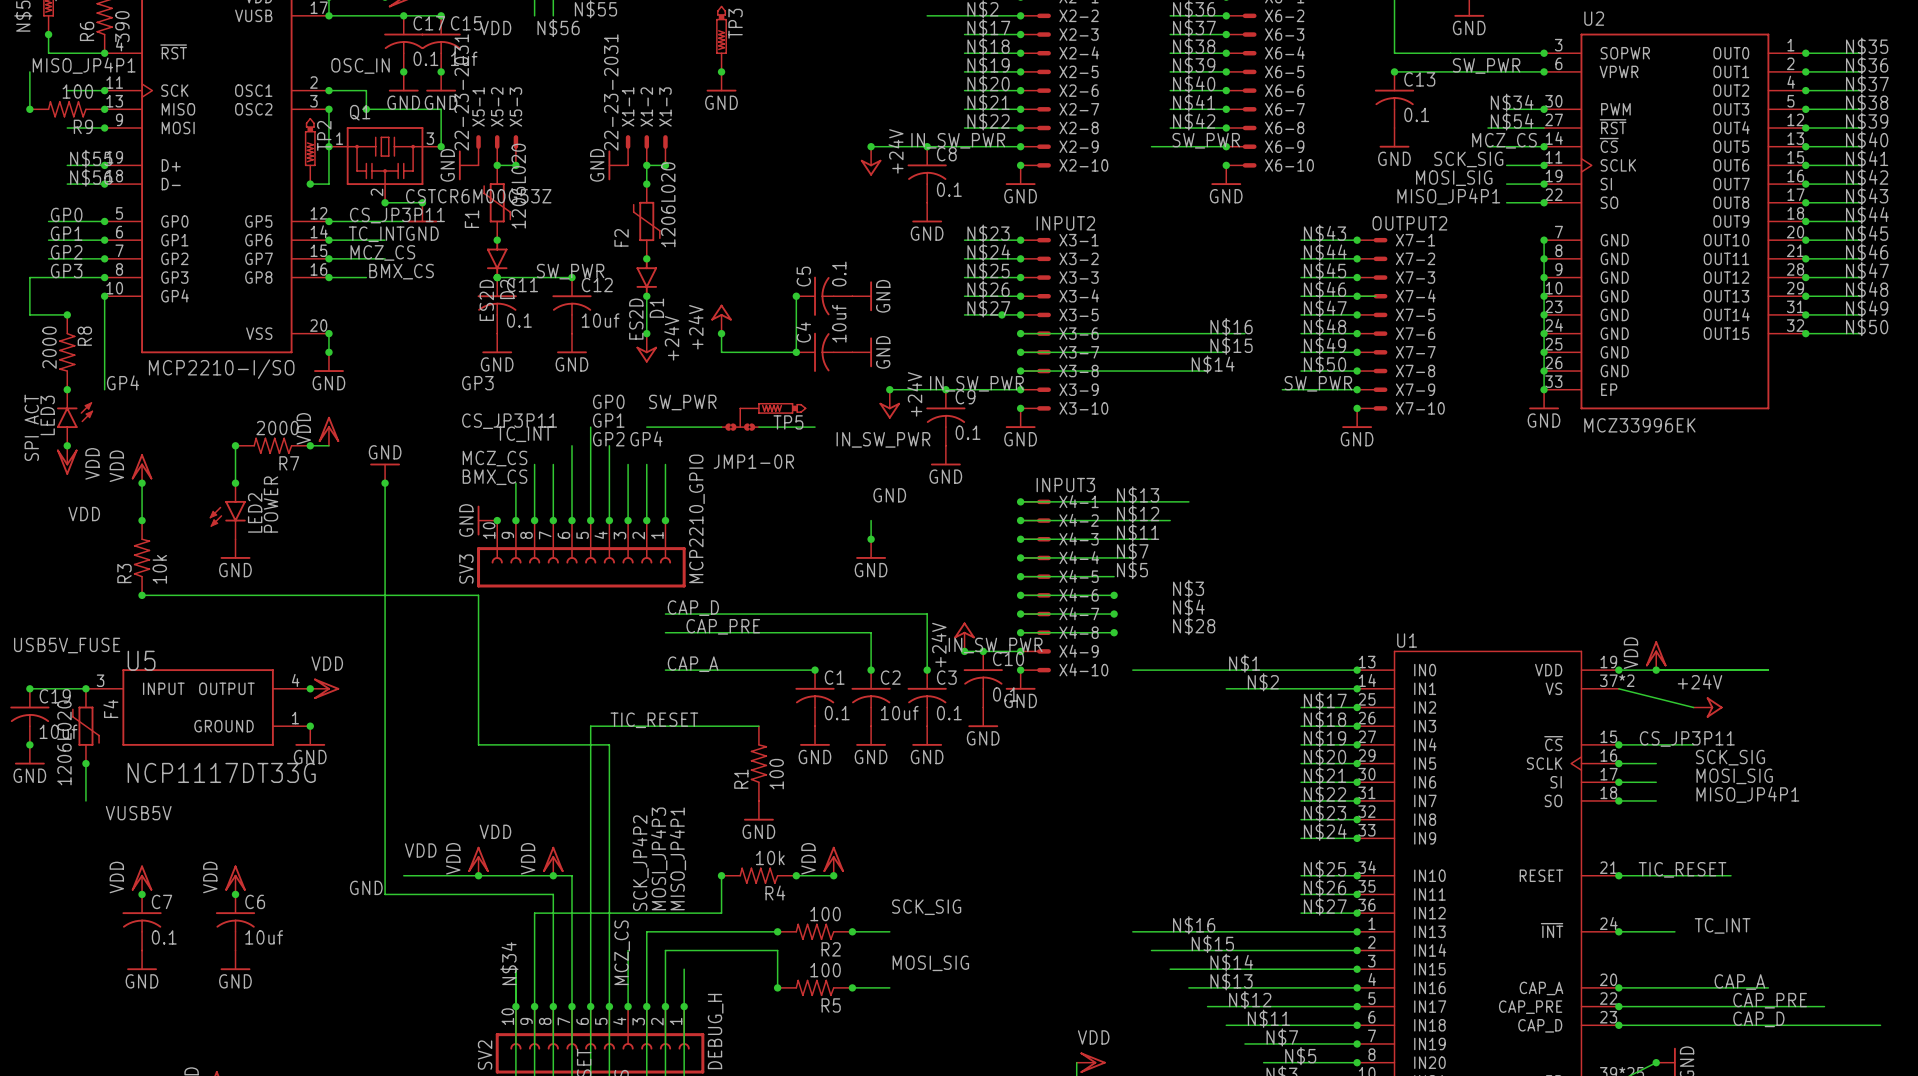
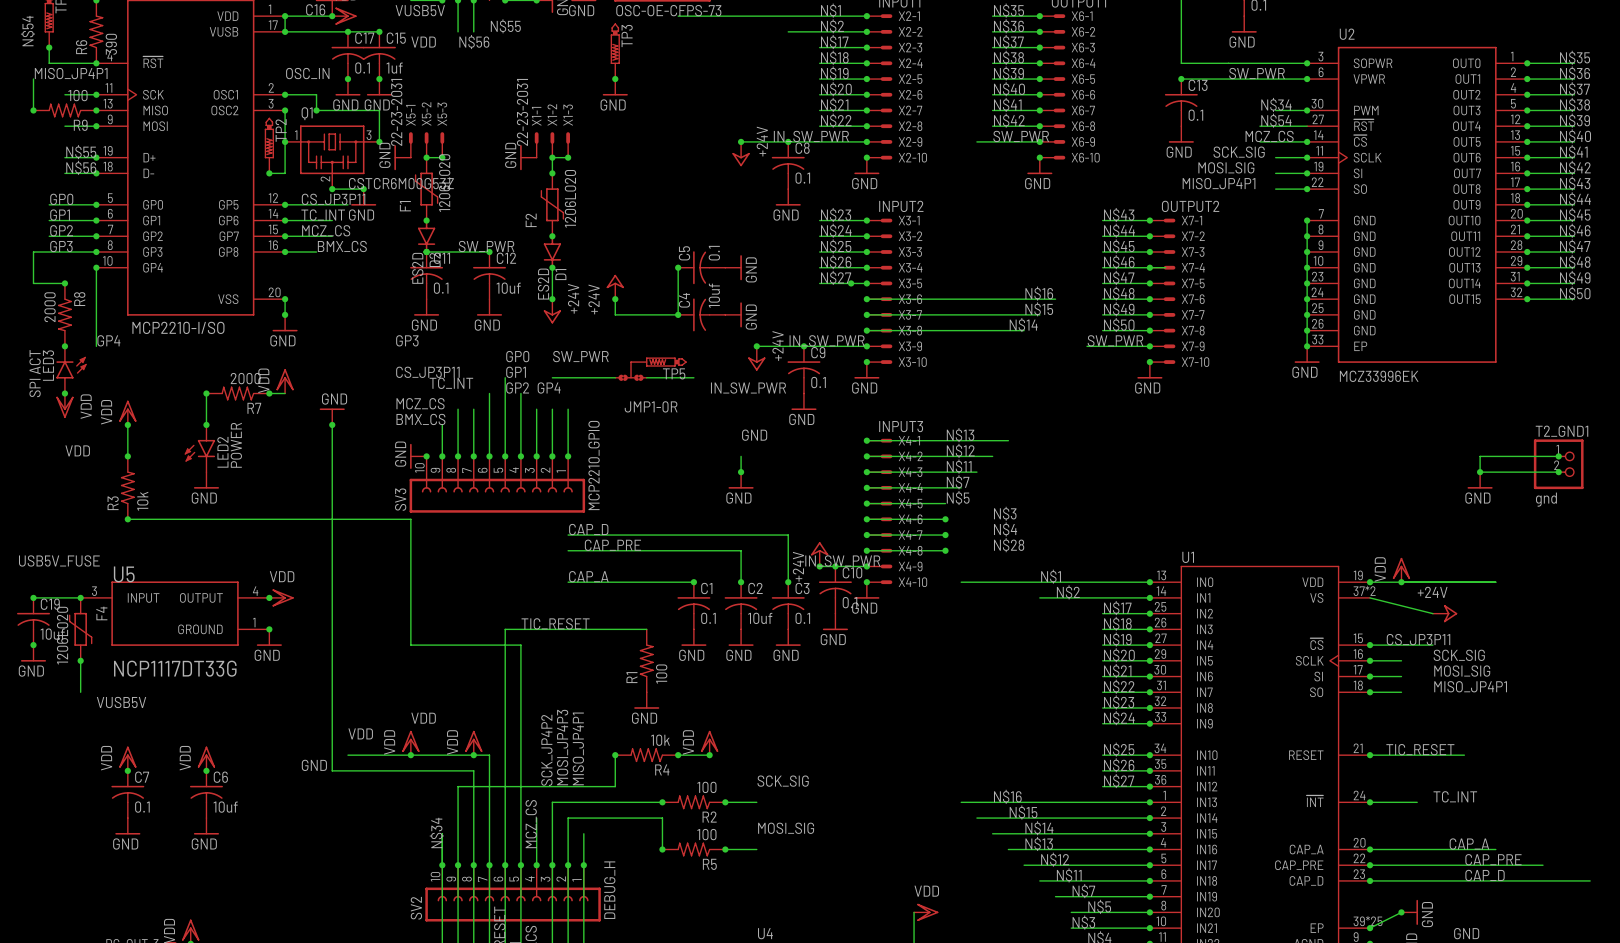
wire: none -> (1558, 456) (1480, 456) (1480, 472) (1558, 472)
junction: none -> (1558, 456)
T2_GND1: none -> gnd (1558, 464)
junction: none -> (1480, 472)
junction: none -> (1558, 472)
power symbol: none -> GND (1480, 480)

